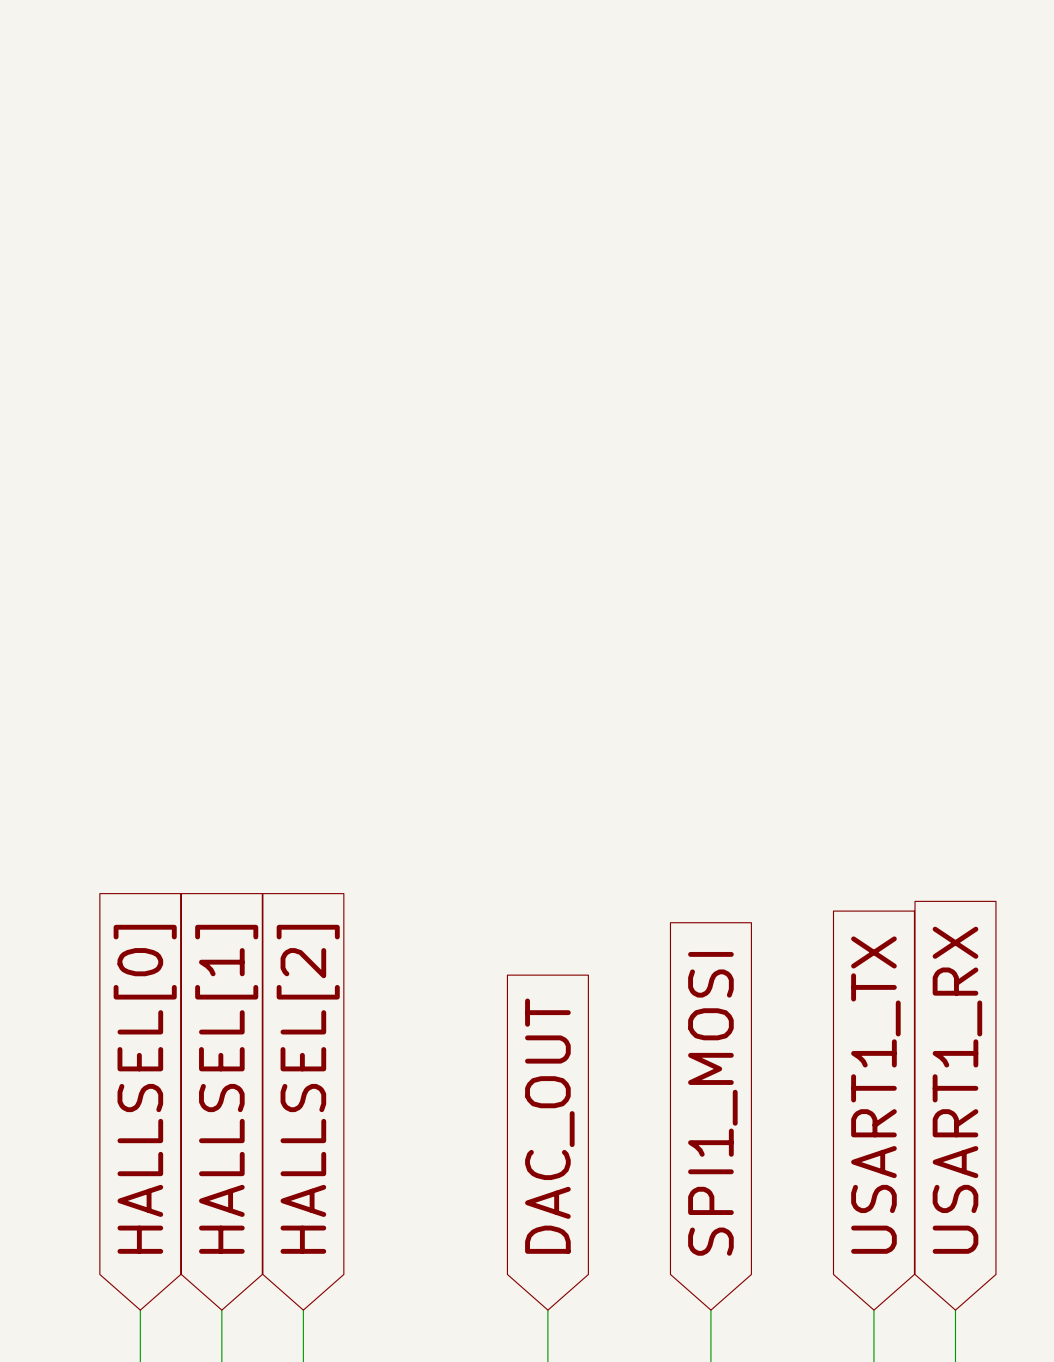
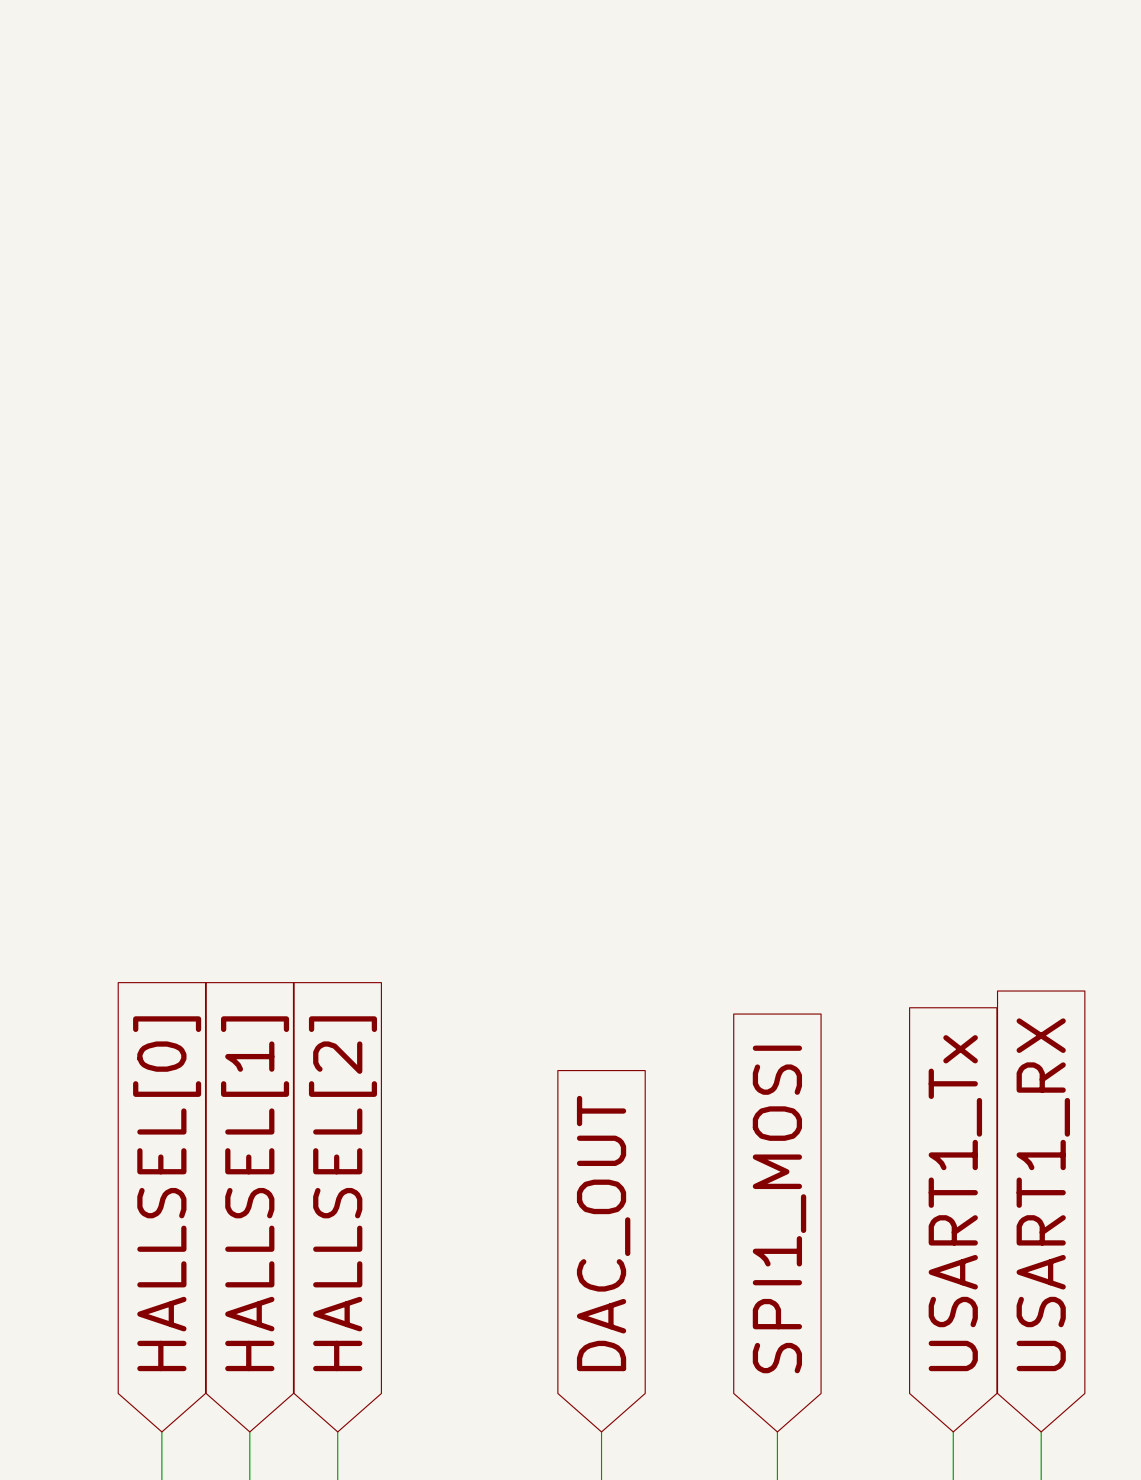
global label: USART1_TX (875, 1095) -> USART1_Tx (955, 1203)

